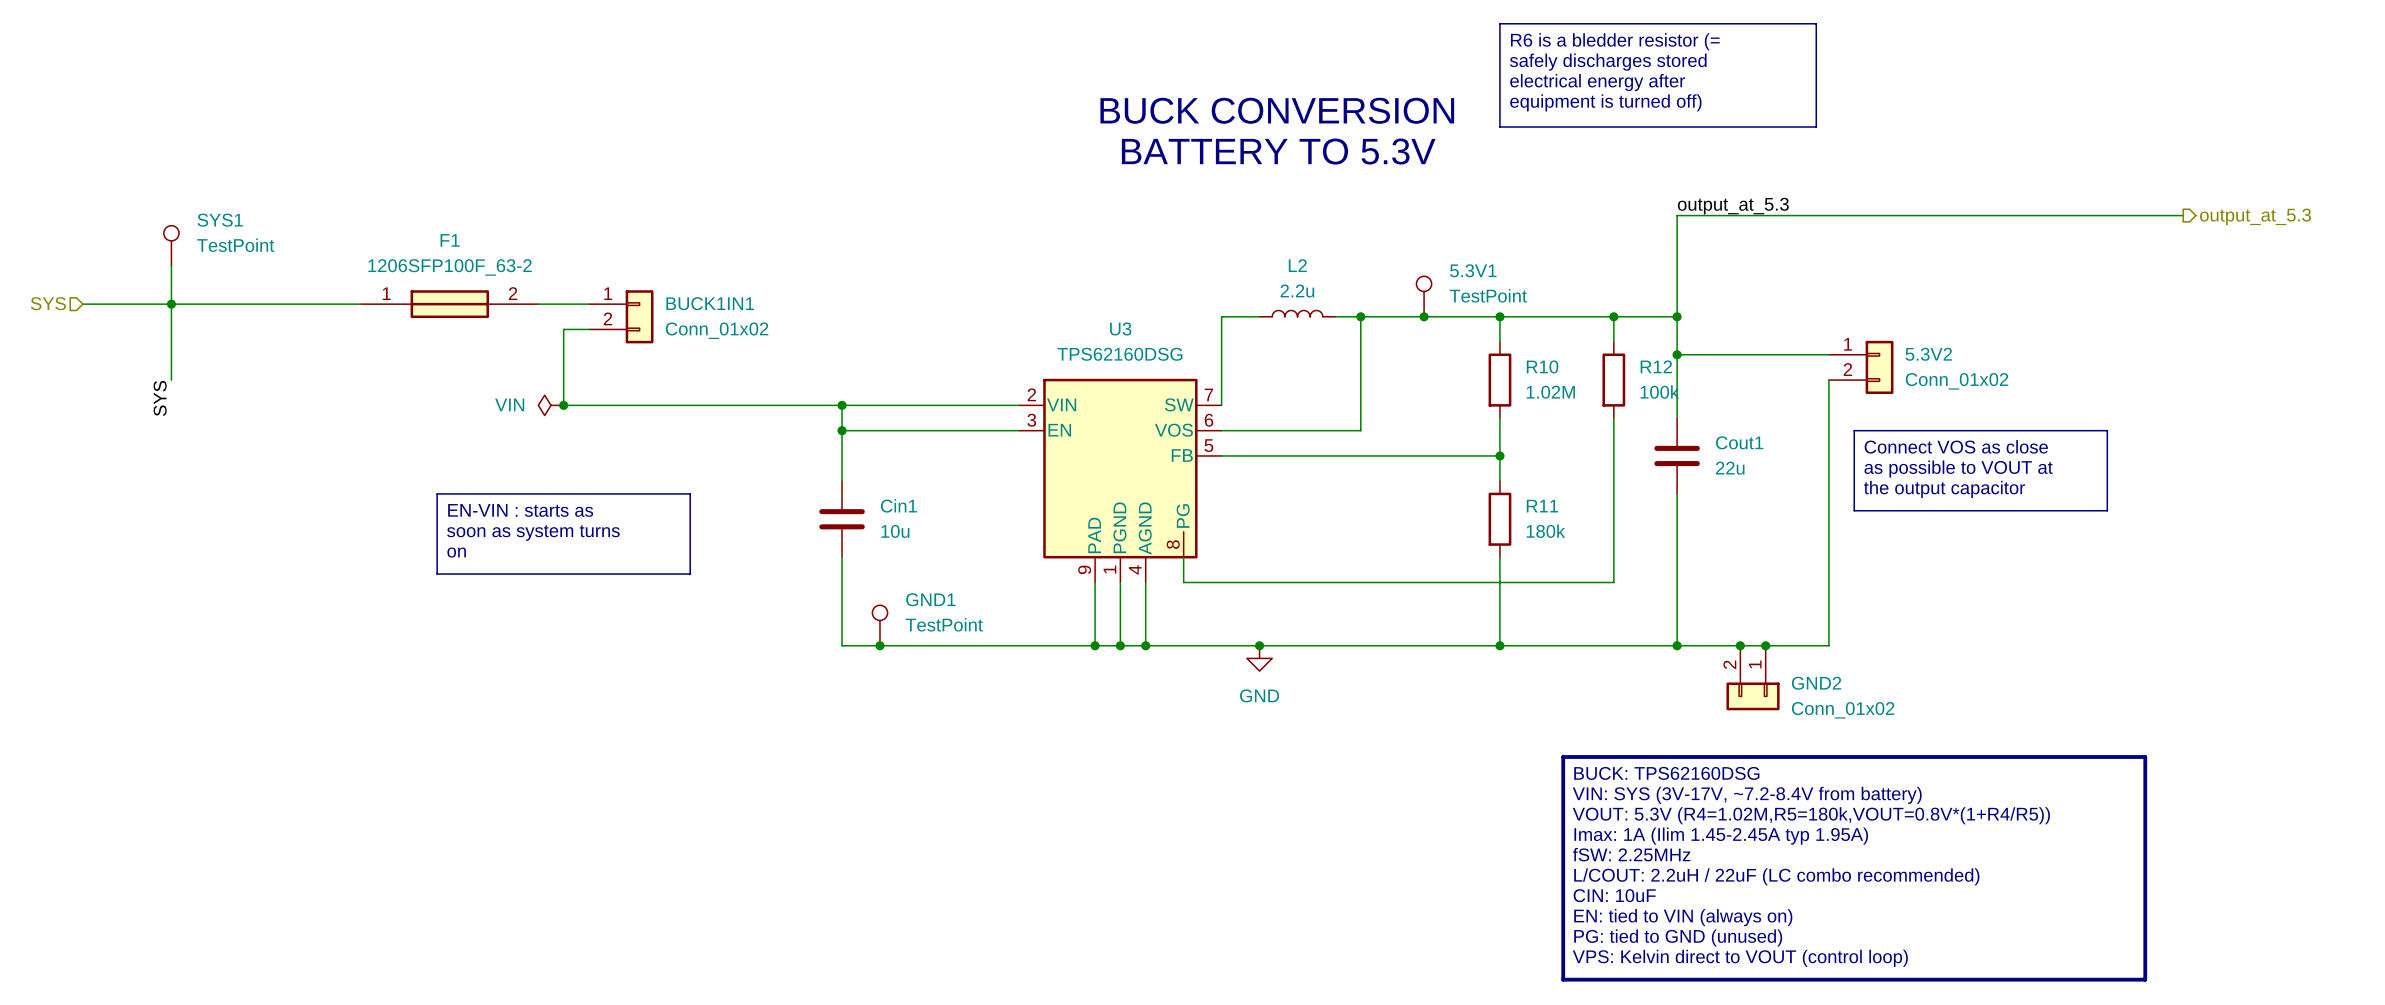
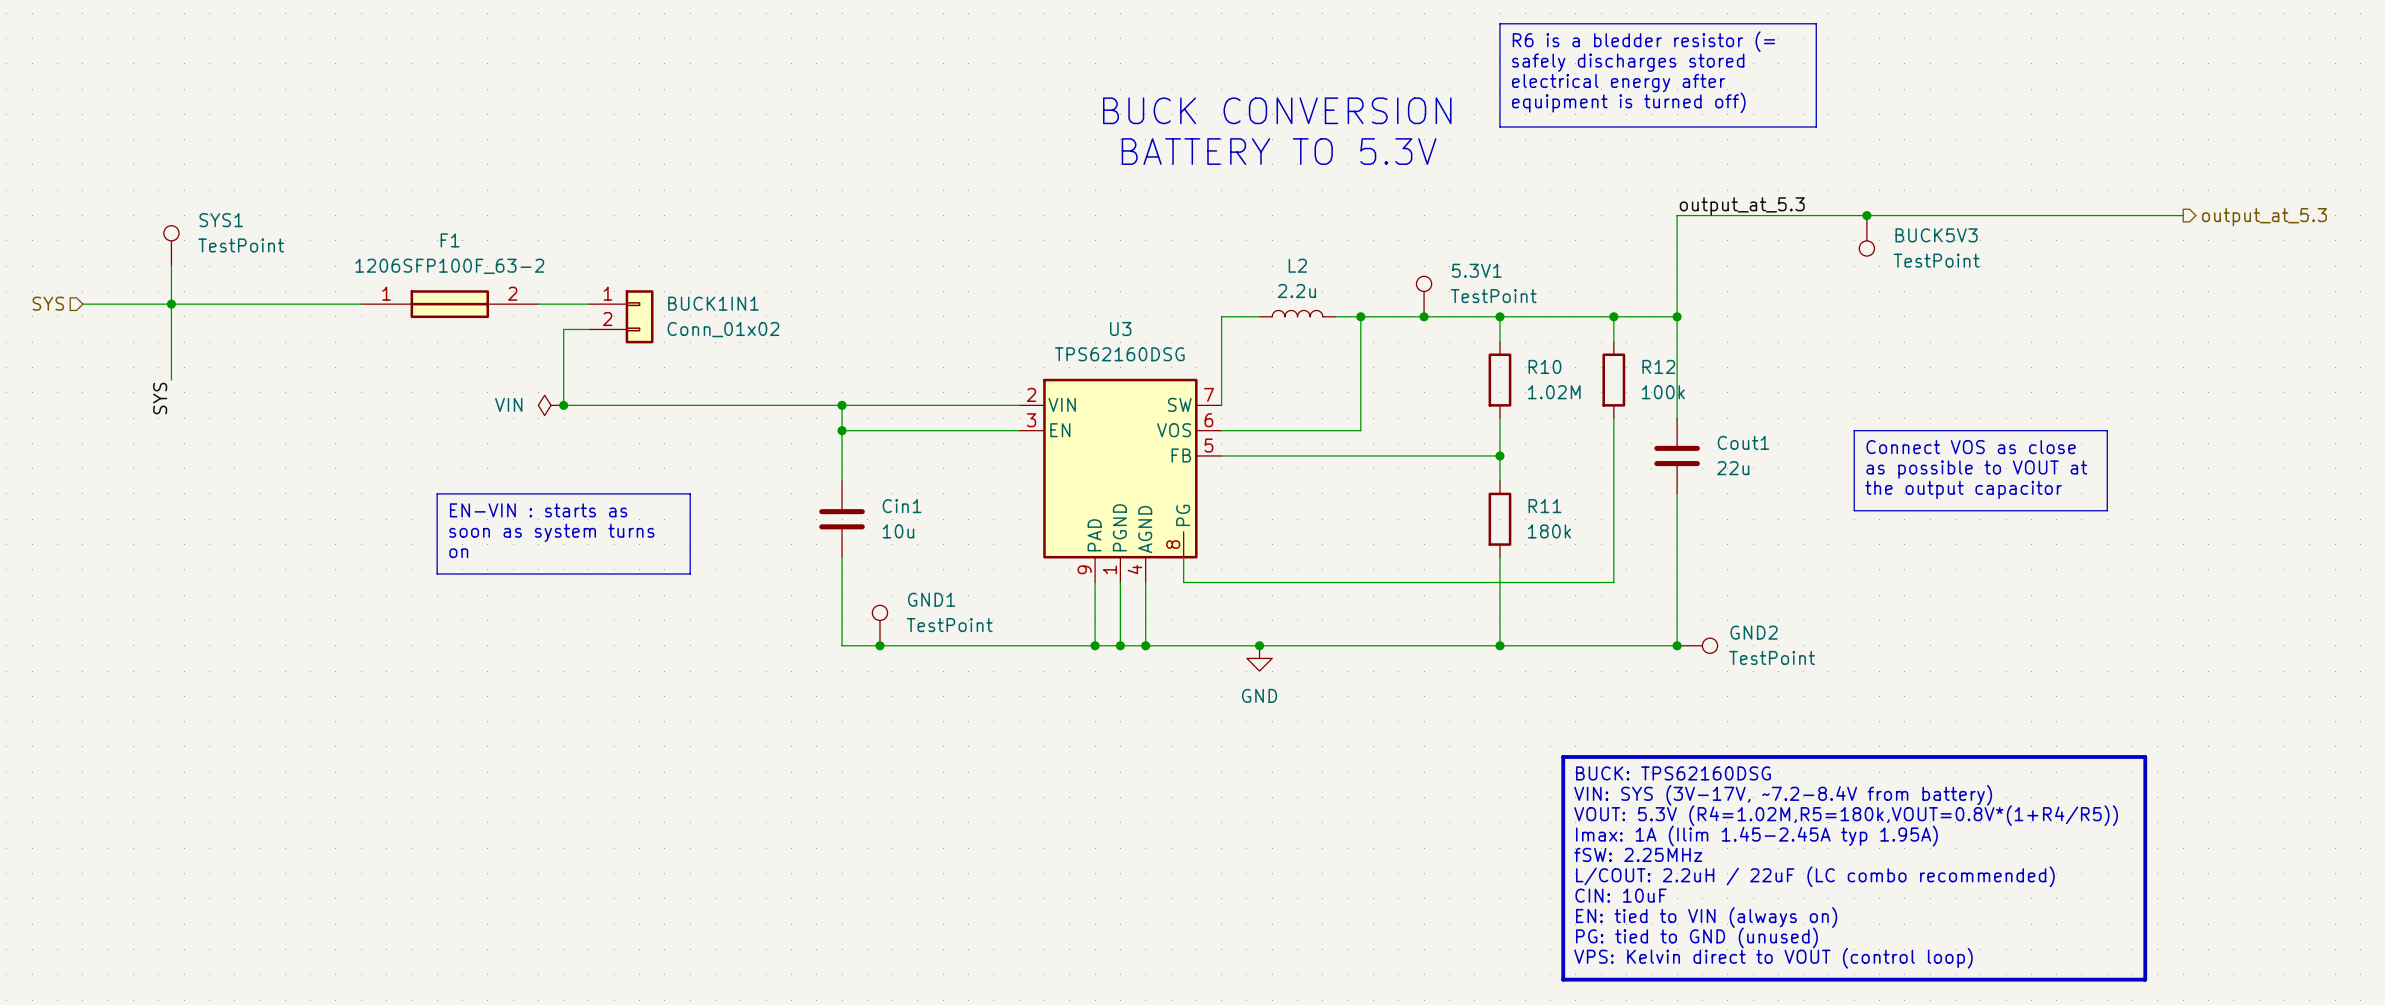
junction: none -> (1866, 215)
BUCK5V3: none -> TestPoint (1866, 235)
wire: (1677, 354) (1828, 354) -> none
junction: (1677, 354) -> none
5.3V2: Conn_01x02 (1861, 367) -> none
wire: (1828, 380) (1828, 645) (1677, 645) -> none
GND2 symbol: [1726, 645, 1780, 711] -> [1677, 638, 1718, 654]
junction: (1740, 645) -> none
junction: (1765, 645) -> none
GND2 value: Conn_01x02 (1843, 710) -> TestPoint (1772, 657)

